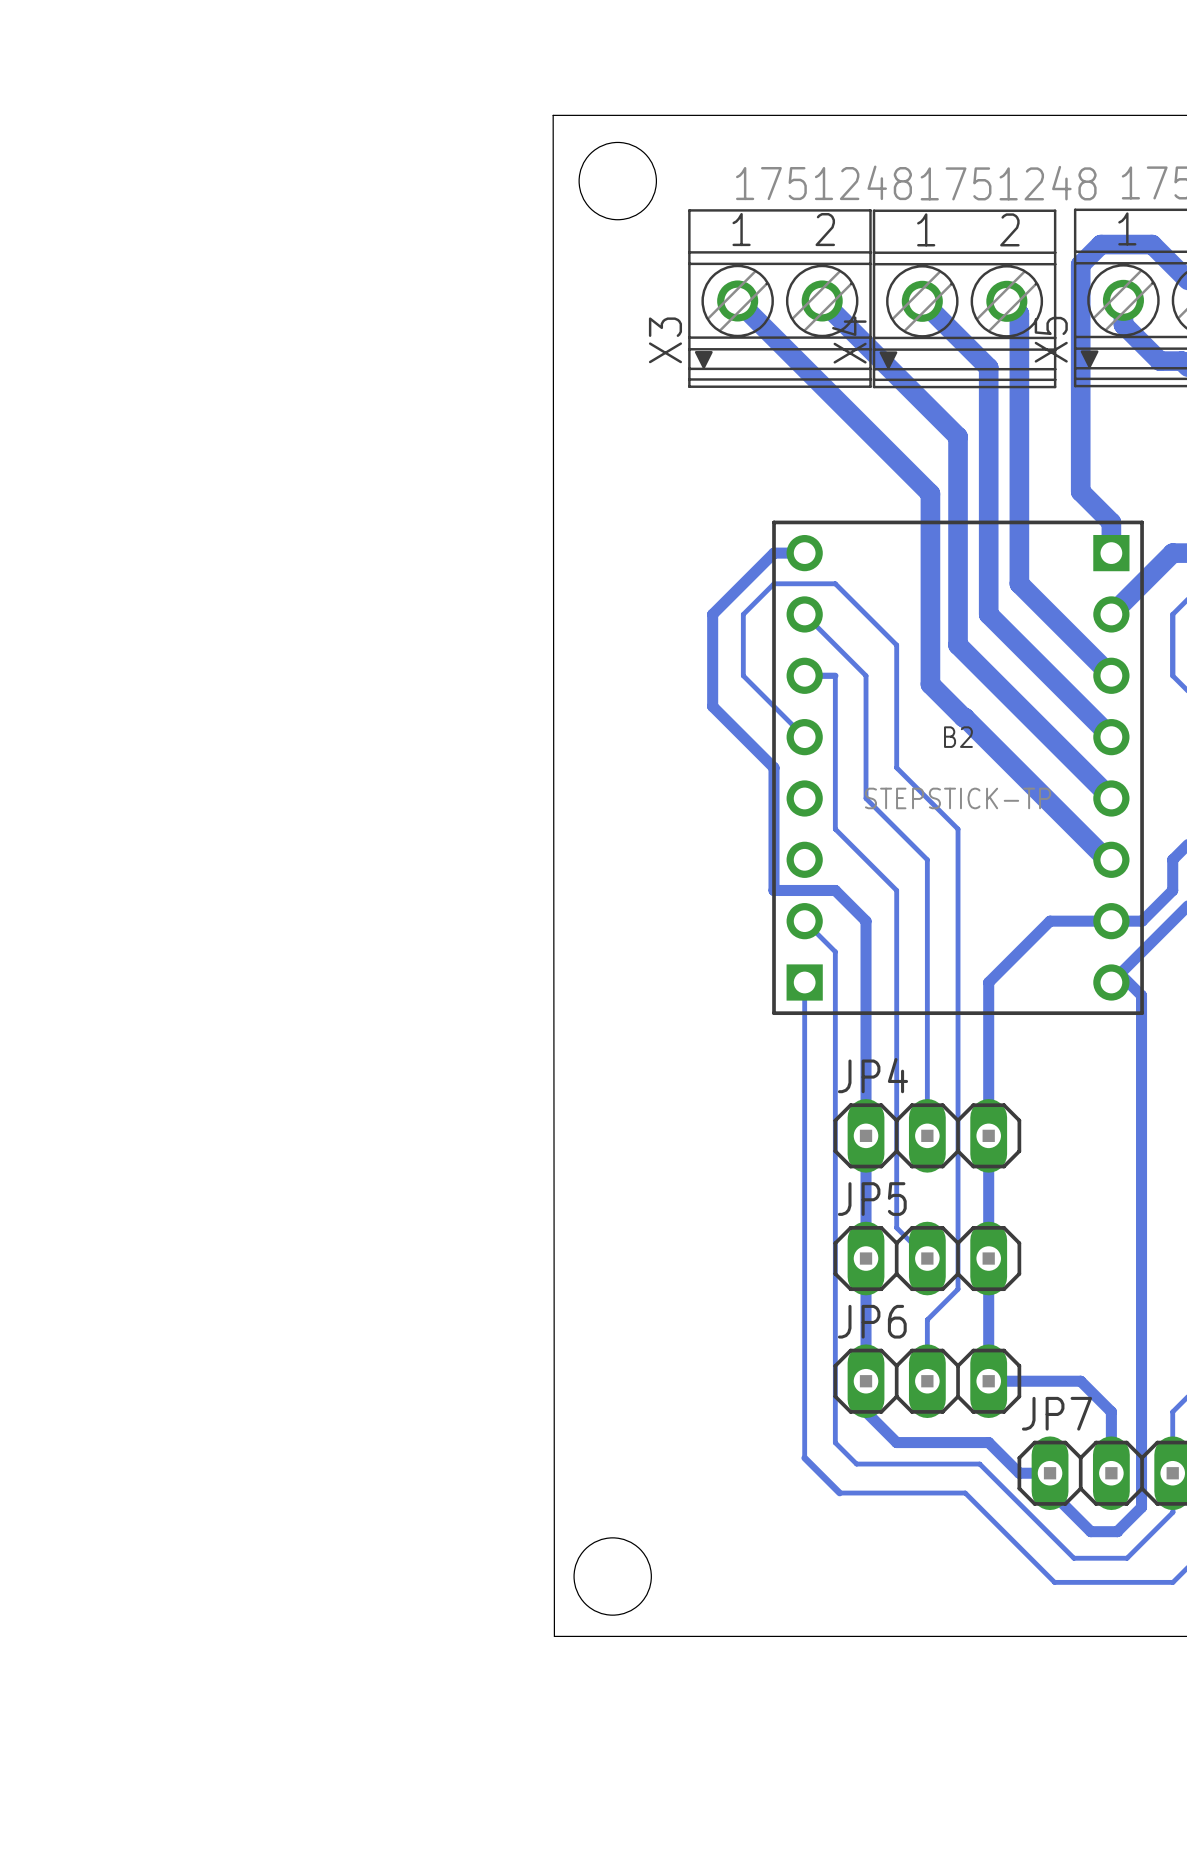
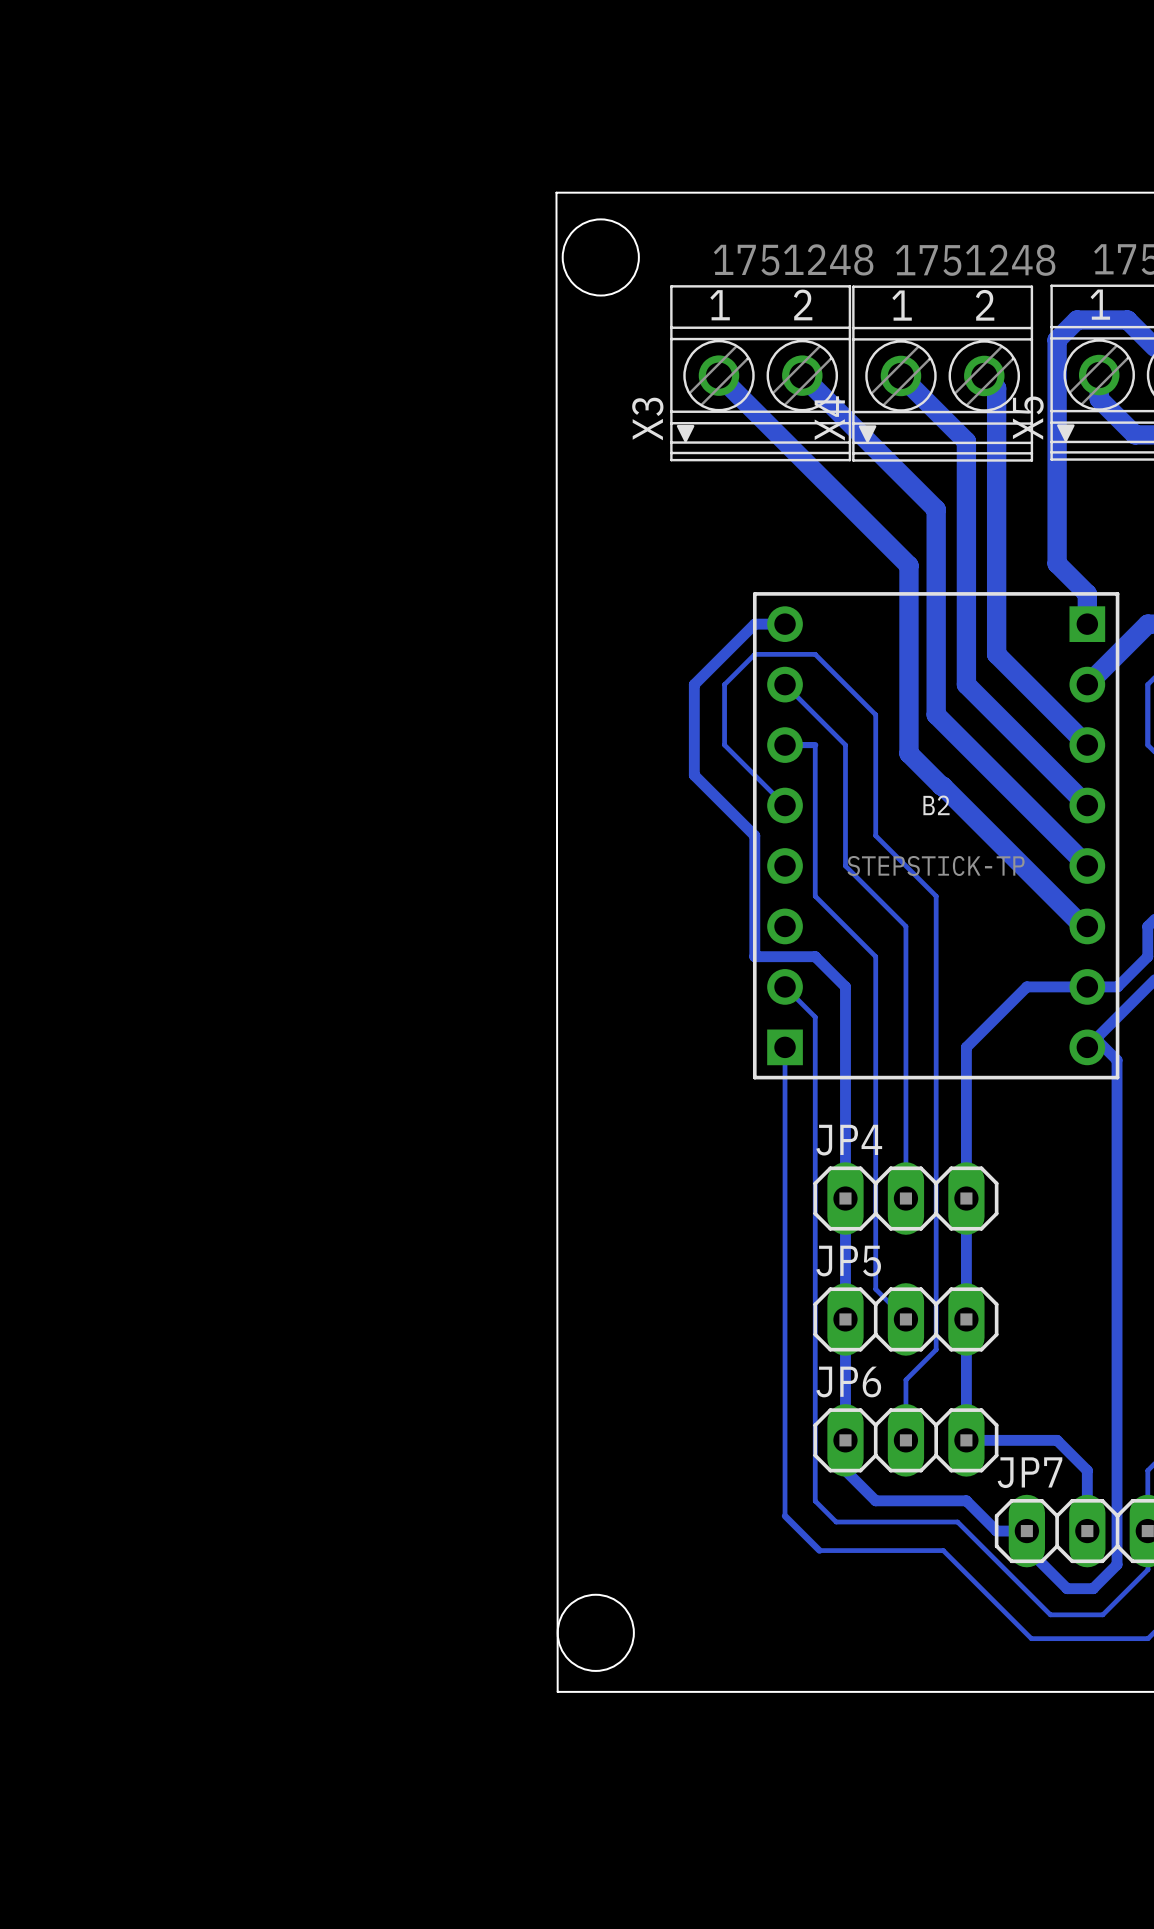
board edge: (572, 115) (553, 115) (554, 1636) (574, 1636) -> (556, 192) (557, 1691)

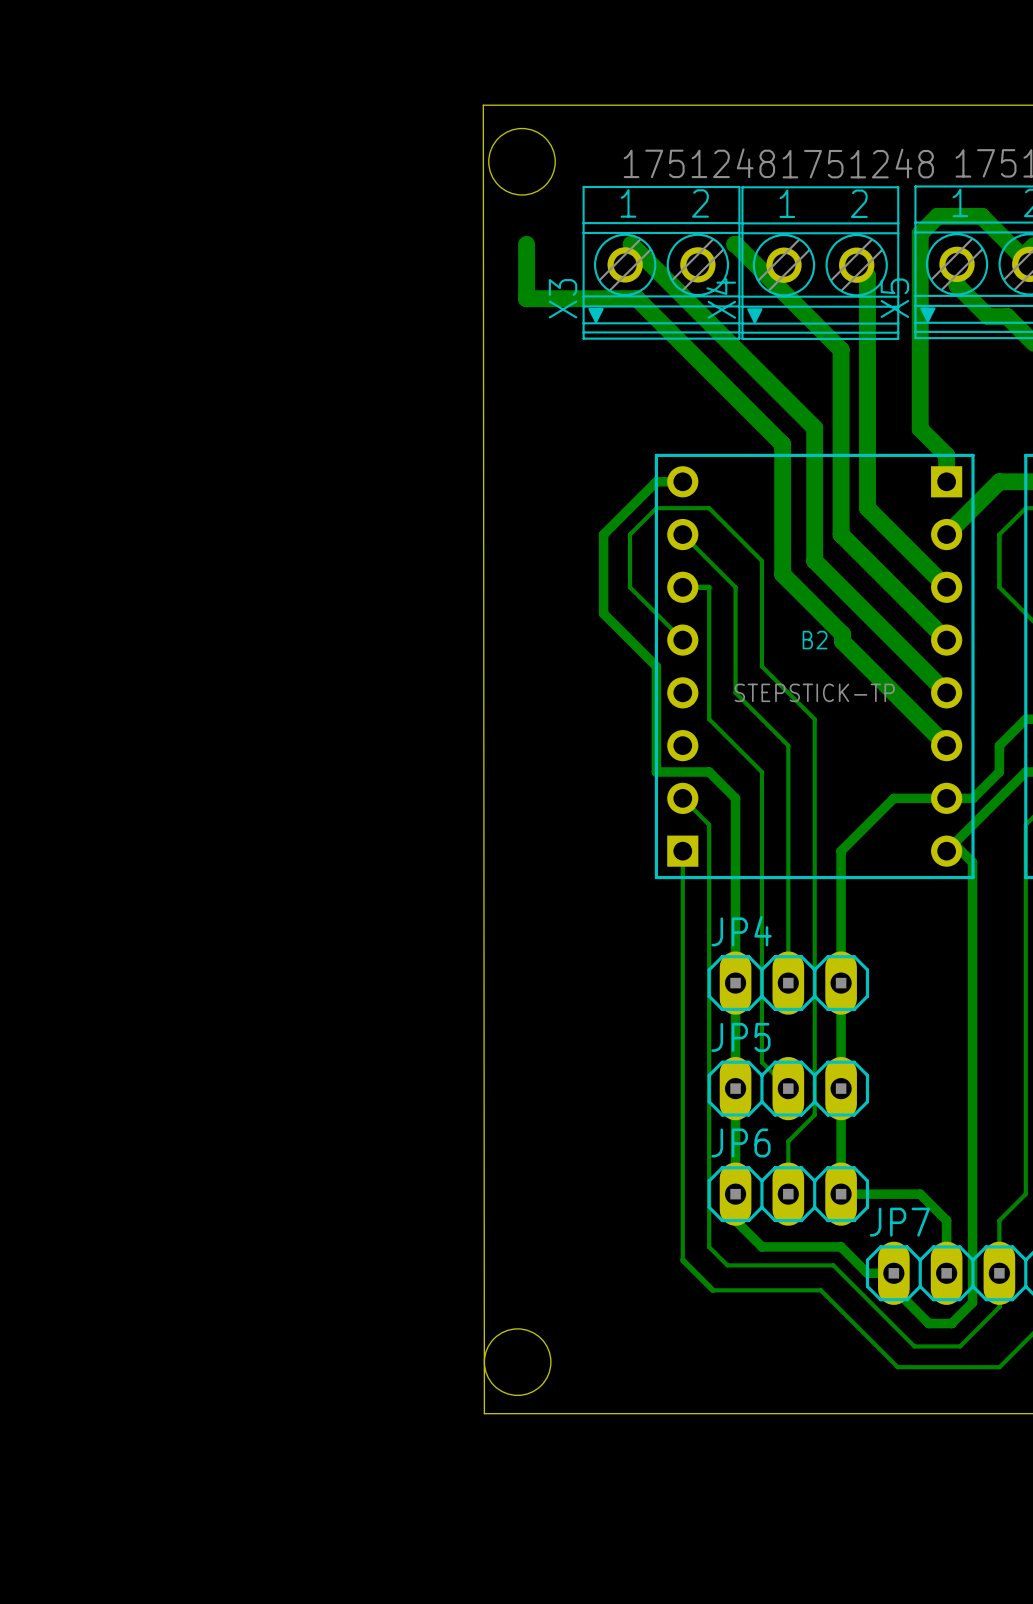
bottom track: (718, 375) (908, 565) (908, 753) (1083, 926) (1087, 926) -> (526, 244) (526, 298) (637, 298) (782, 444) (782, 574) (842, 634) (842, 641) (946, 745)
bottom track: (802, 375) (936, 509) (936, 562) -> (631, 244) (814, 427)
bottom track: (900, 375) (966, 441) (966, 472) -> (734, 244) (841, 349)

